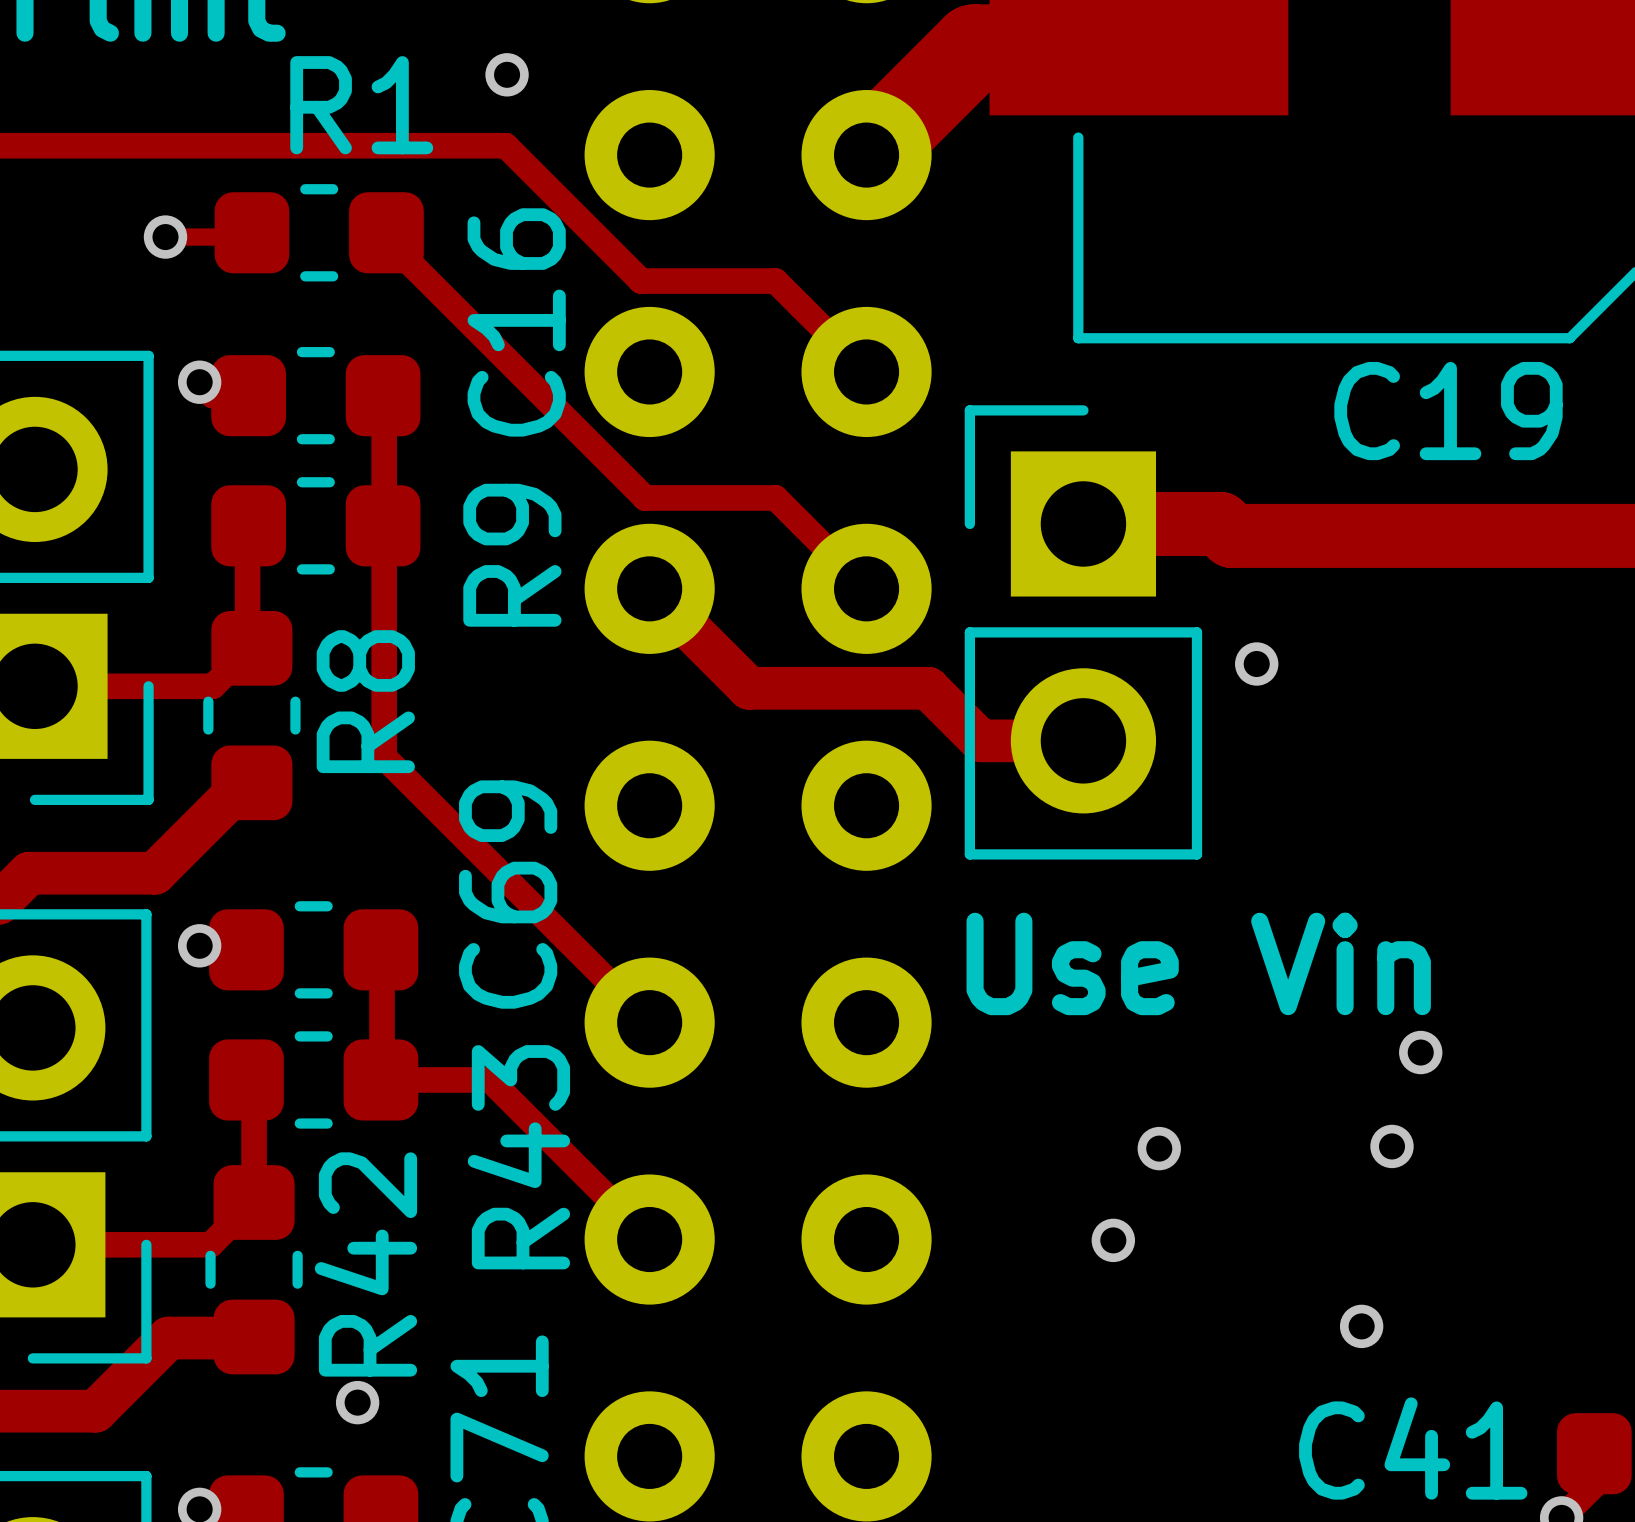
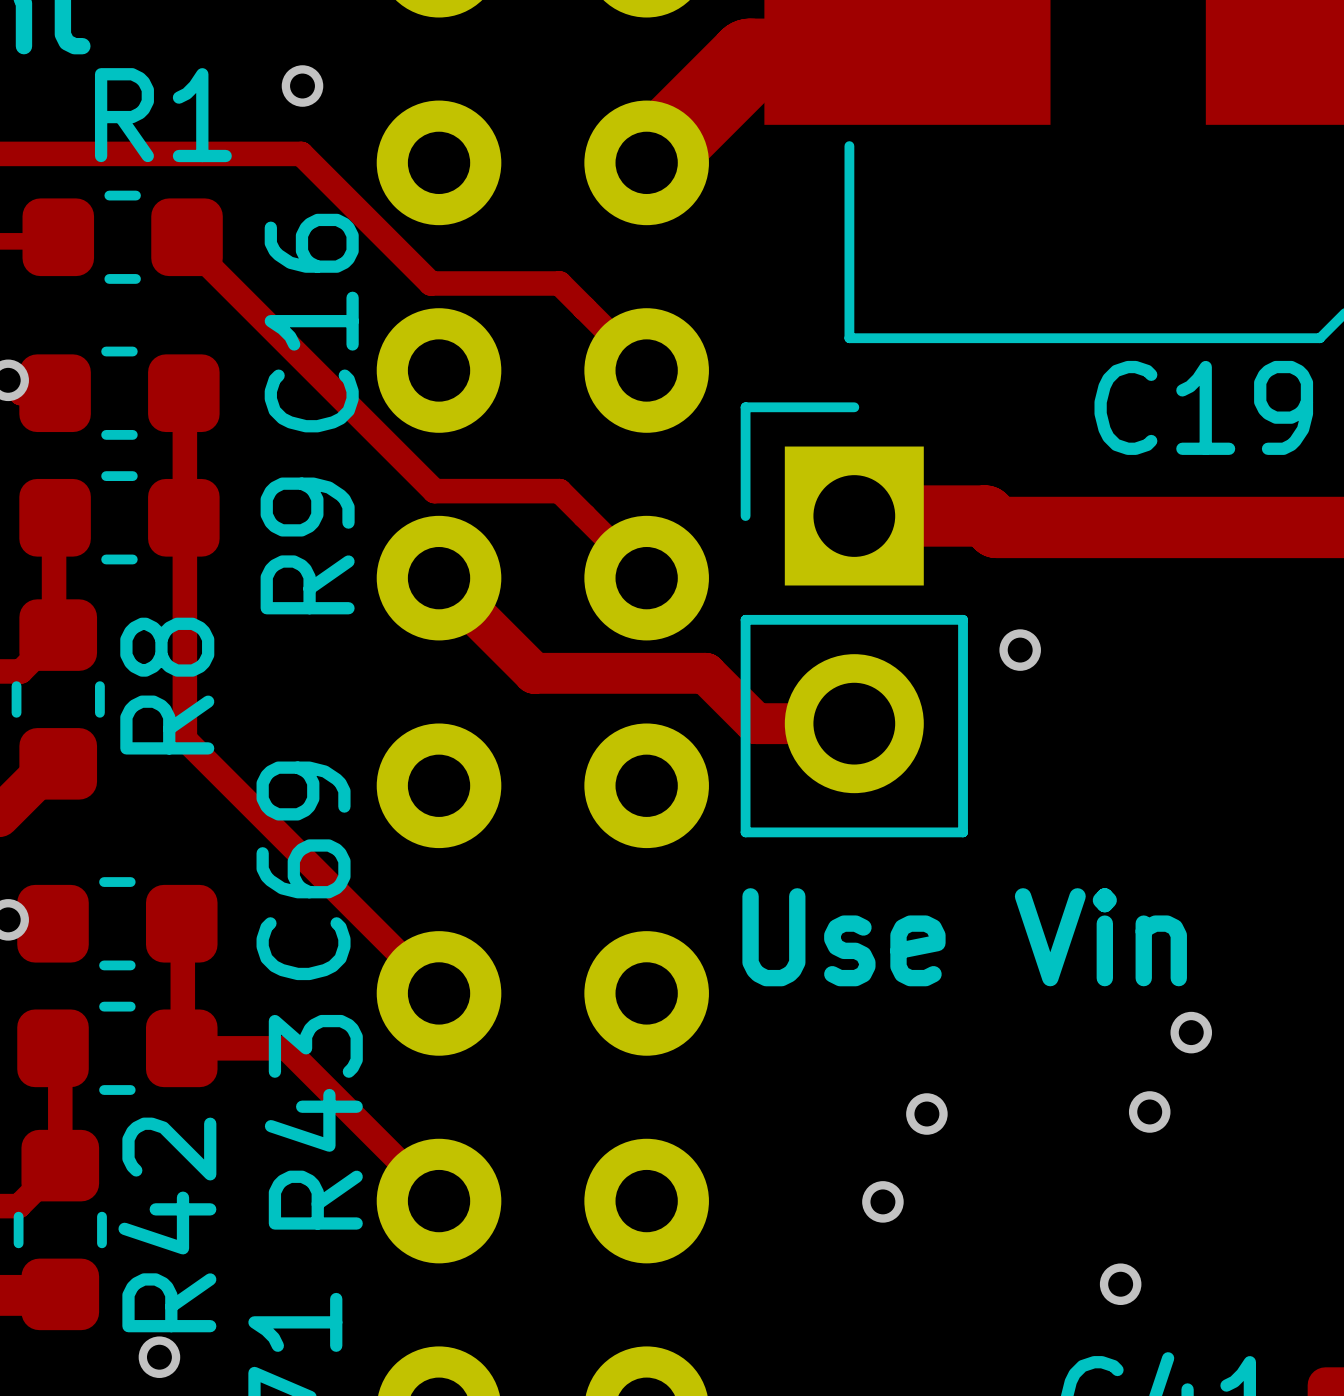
via position: (1420, 1052) -> (1191, 1032)

